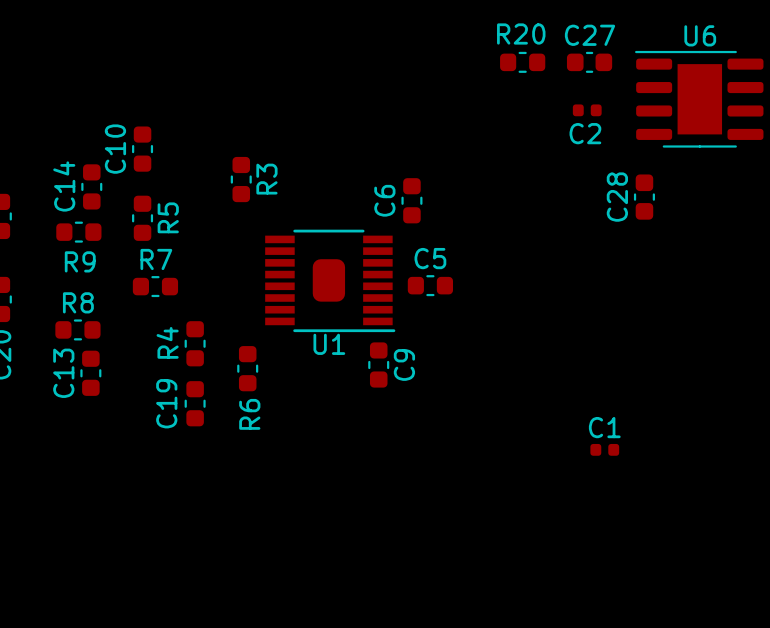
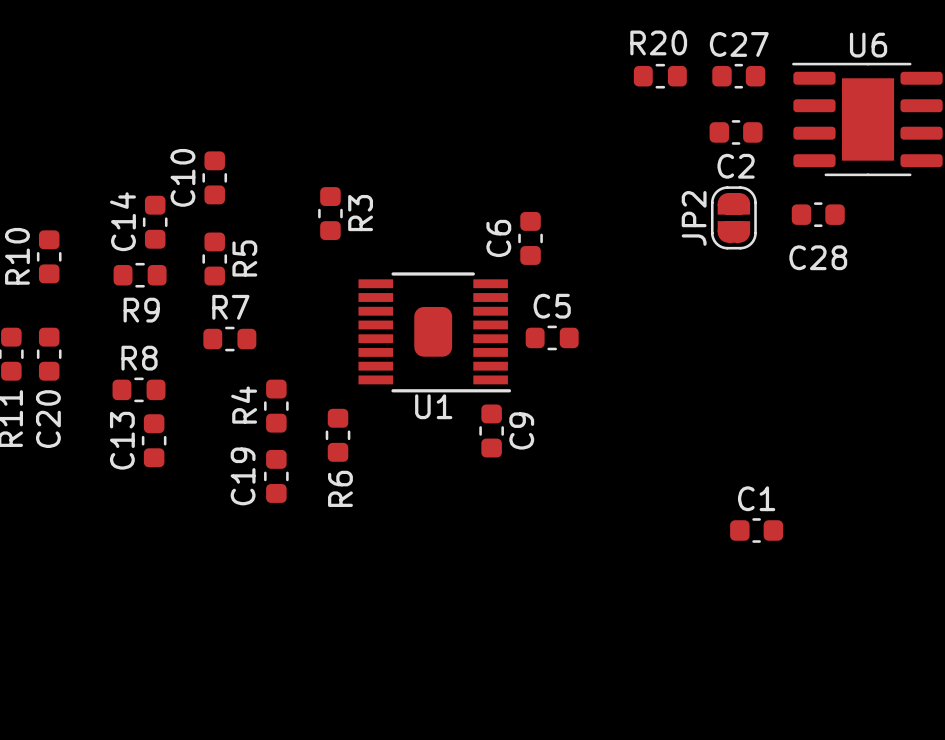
C2 footprint: [572, 104, 602, 117] -> [709, 120, 763, 145]
JP2: none -> (733, 217)
C28 name position: C28 (617, 197) -> C28 (818, 257)
C28 rotation: 0° (644, 197) -> 90° clockwise (818, 214)
C1 footprint: [590, 443, 620, 456] -> [730, 518, 784, 543]

